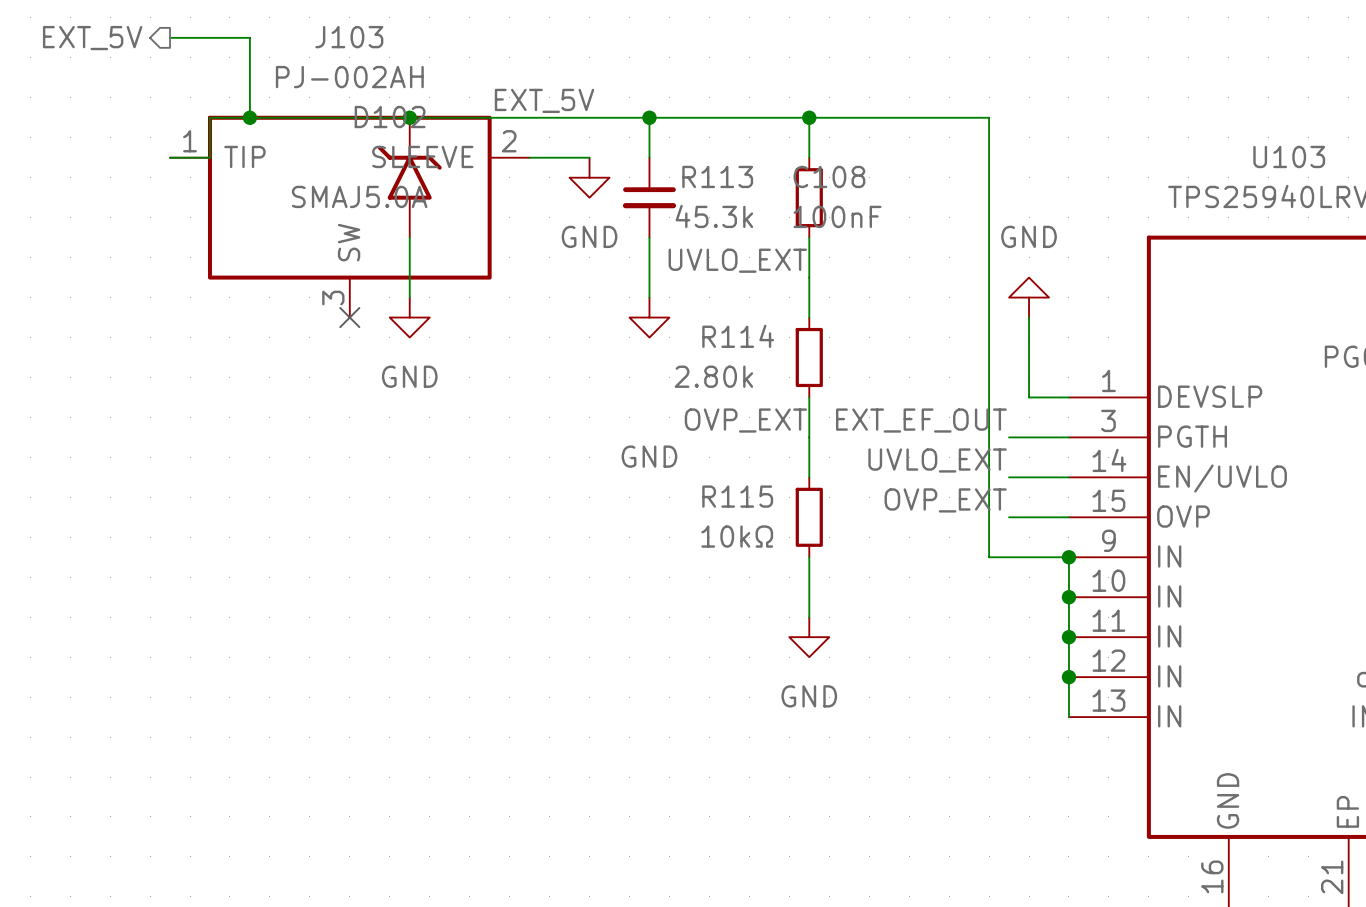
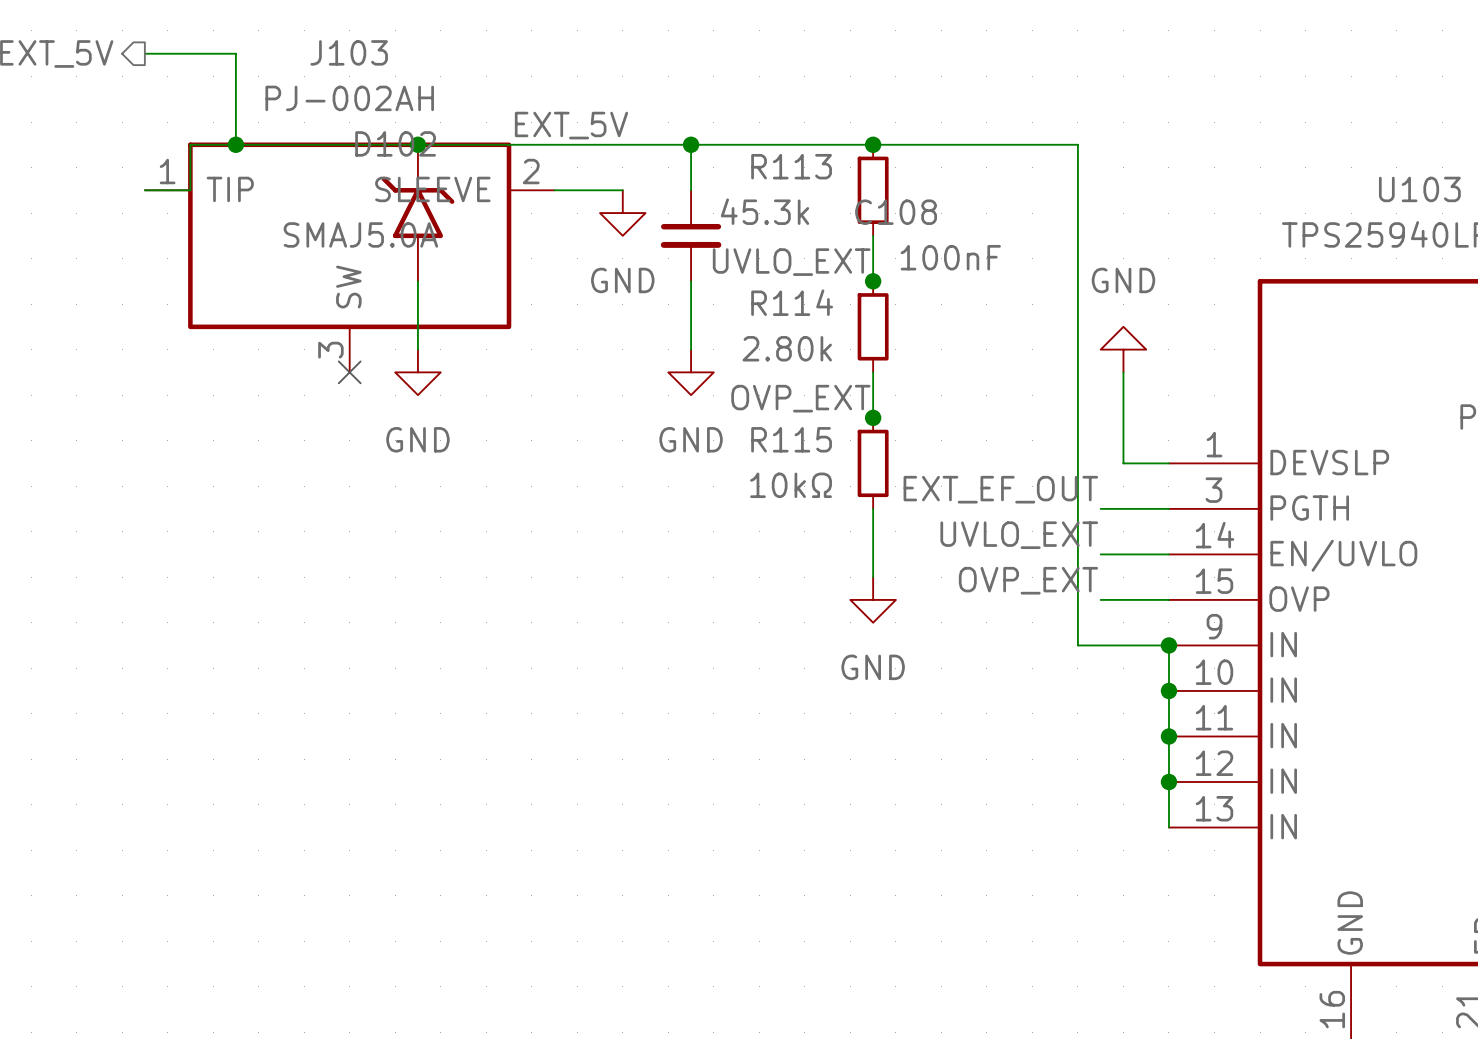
wire: (809, 117) (809, 157) -> (873, 235) (873, 281)
R113 name position: R113 (717, 176) -> R113 (791, 166)
R113 position: (809, 197) -> (873, 190)
C108 value position: 100nF (837, 216) -> 100nF (950, 257)
wire: (809, 237) (809, 317) -> (873, 417) (873, 372)
junction: none -> (873, 281)
label position: UVLO_EXT (737, 260) -> UVLO_EXT (791, 262)
R114 position: (809, 357) -> (873, 326)
junction: none -> (873, 417)
R114 value position: 2.80k (713, 376) -> 2.80k (787, 348)
wire: (809, 397) (809, 437) -> none
label position: OVP_EXT (745, 420) -> OVP_EXT (800, 398)
power symbol text position: GND (649, 456) -> GND (691, 439)
R115 position: (809, 517) -> (873, 463)
wire: (809, 557) (809, 617) -> none
power symbol position: GND (809, 637) -> GND (873, 599)

